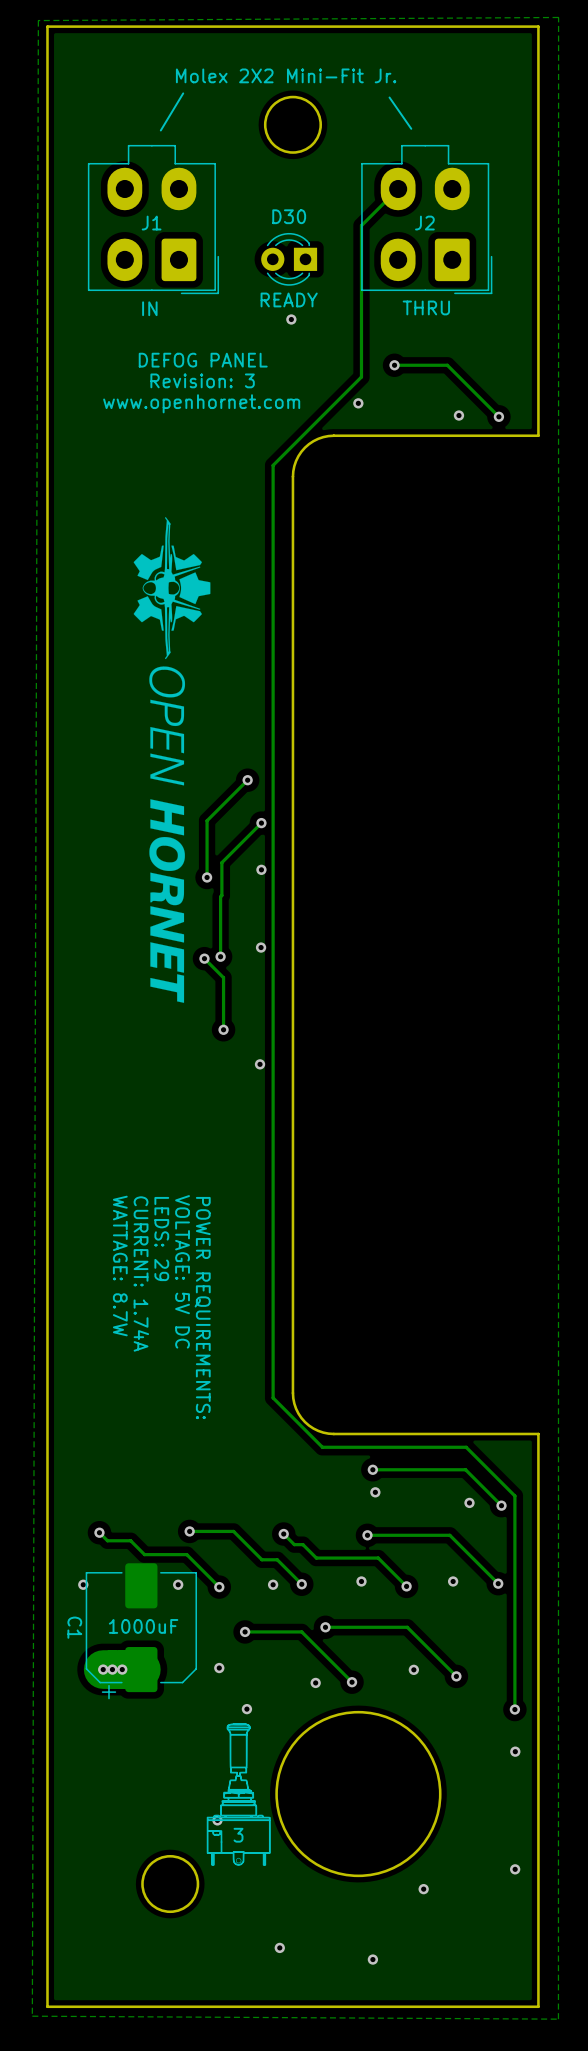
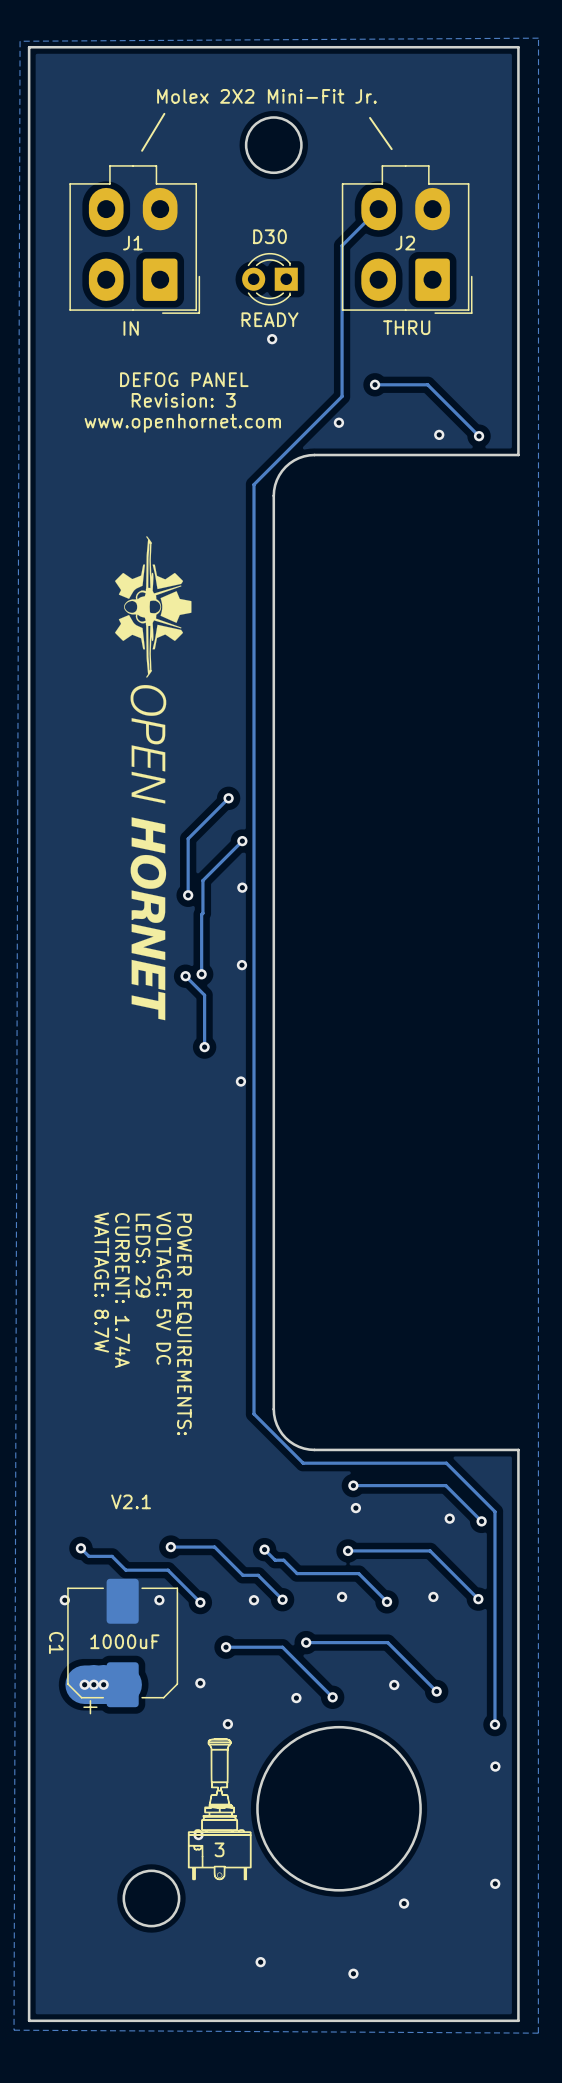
text: none -> V2.1 (131, 1501)

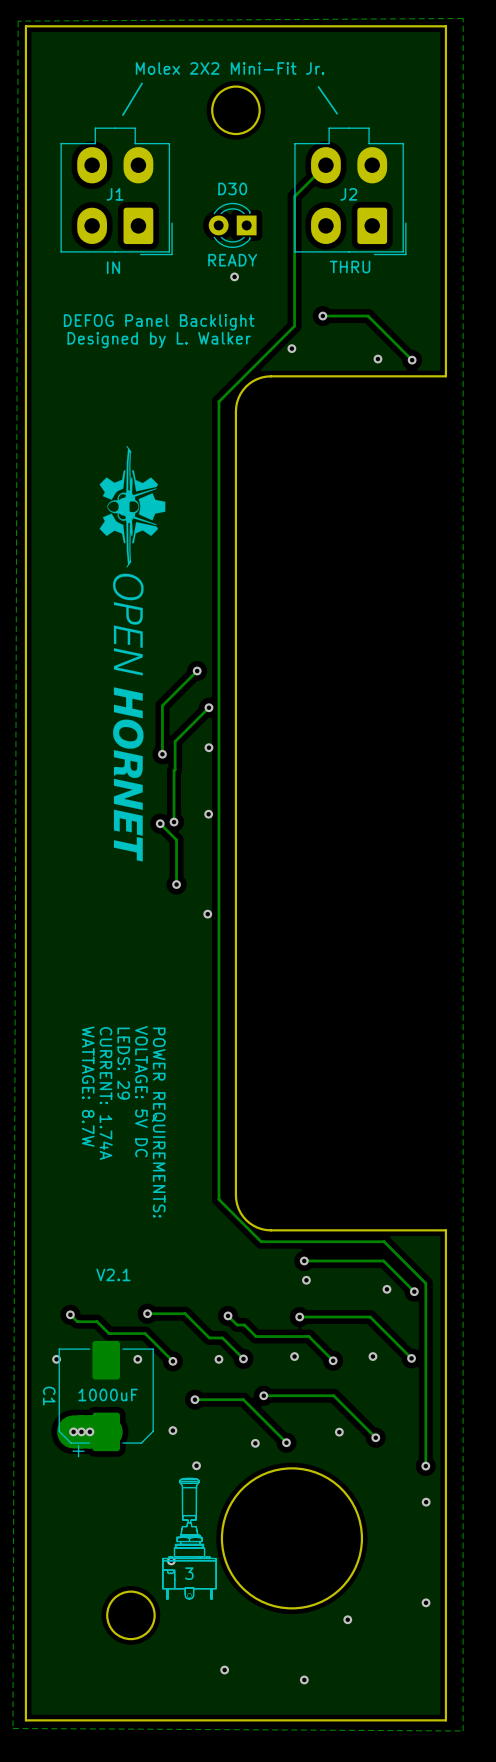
text: DEFOG PANEL (184, 379) -> none
text: none -> DEFOG Panel Backlight (159, 322)
text: Revision: 3 (183, 400) -> none
text: none -> Designed by L. Walker (159, 340)
text: www.openhornet.com (182, 423) -> none

